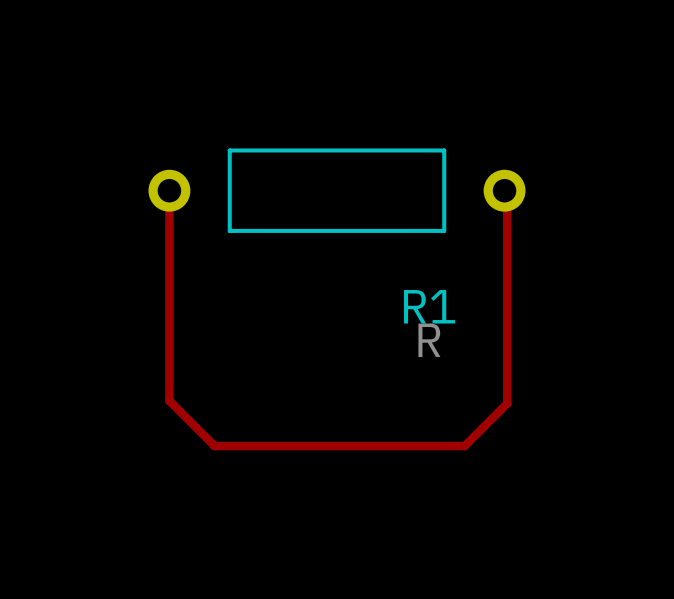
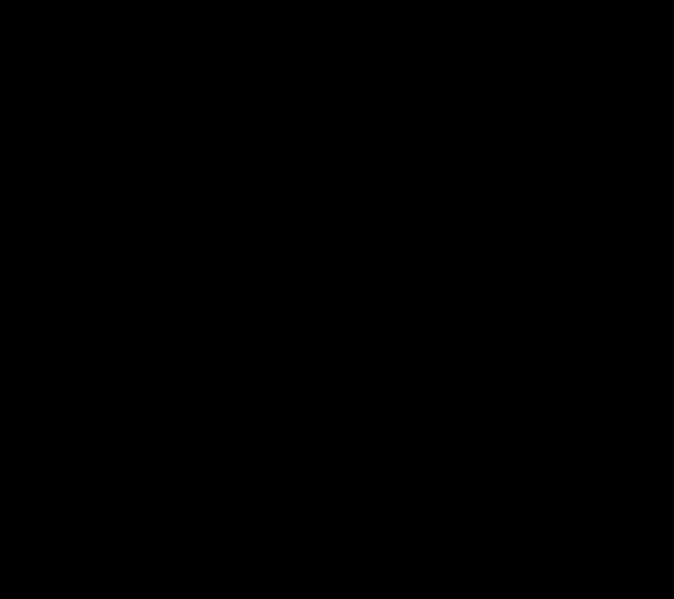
track: (169, 190) (169, 400) (214, 446) (464, 446) (507, 403) (507, 190) (504, 190) -> none
R1: R (337, 190) -> none

